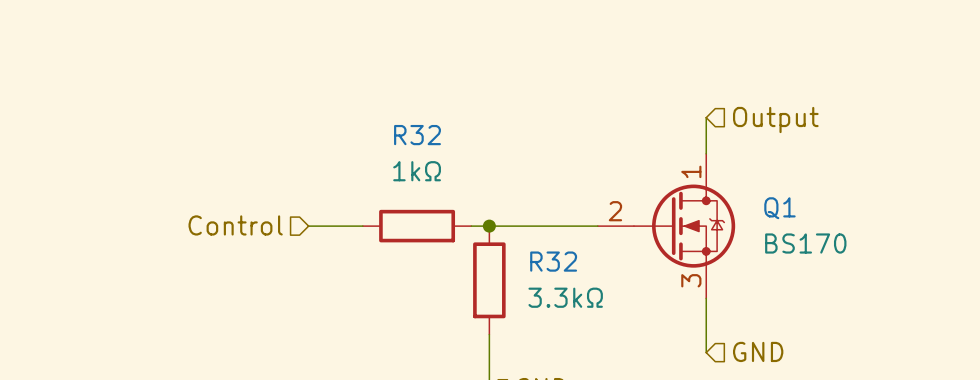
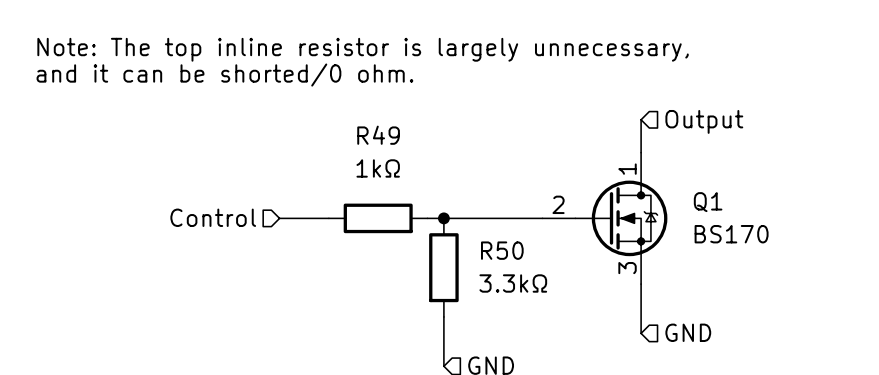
text: none -> Note: The top inline resistor is largely unnecessary, (363, 49)
text: none -> and it can be shorted/0 ohm. (224, 75)
R32 name: R32 (417, 135) -> R49 (378, 135)
R32 name: R32 (553, 261) -> R50 (502, 250)

